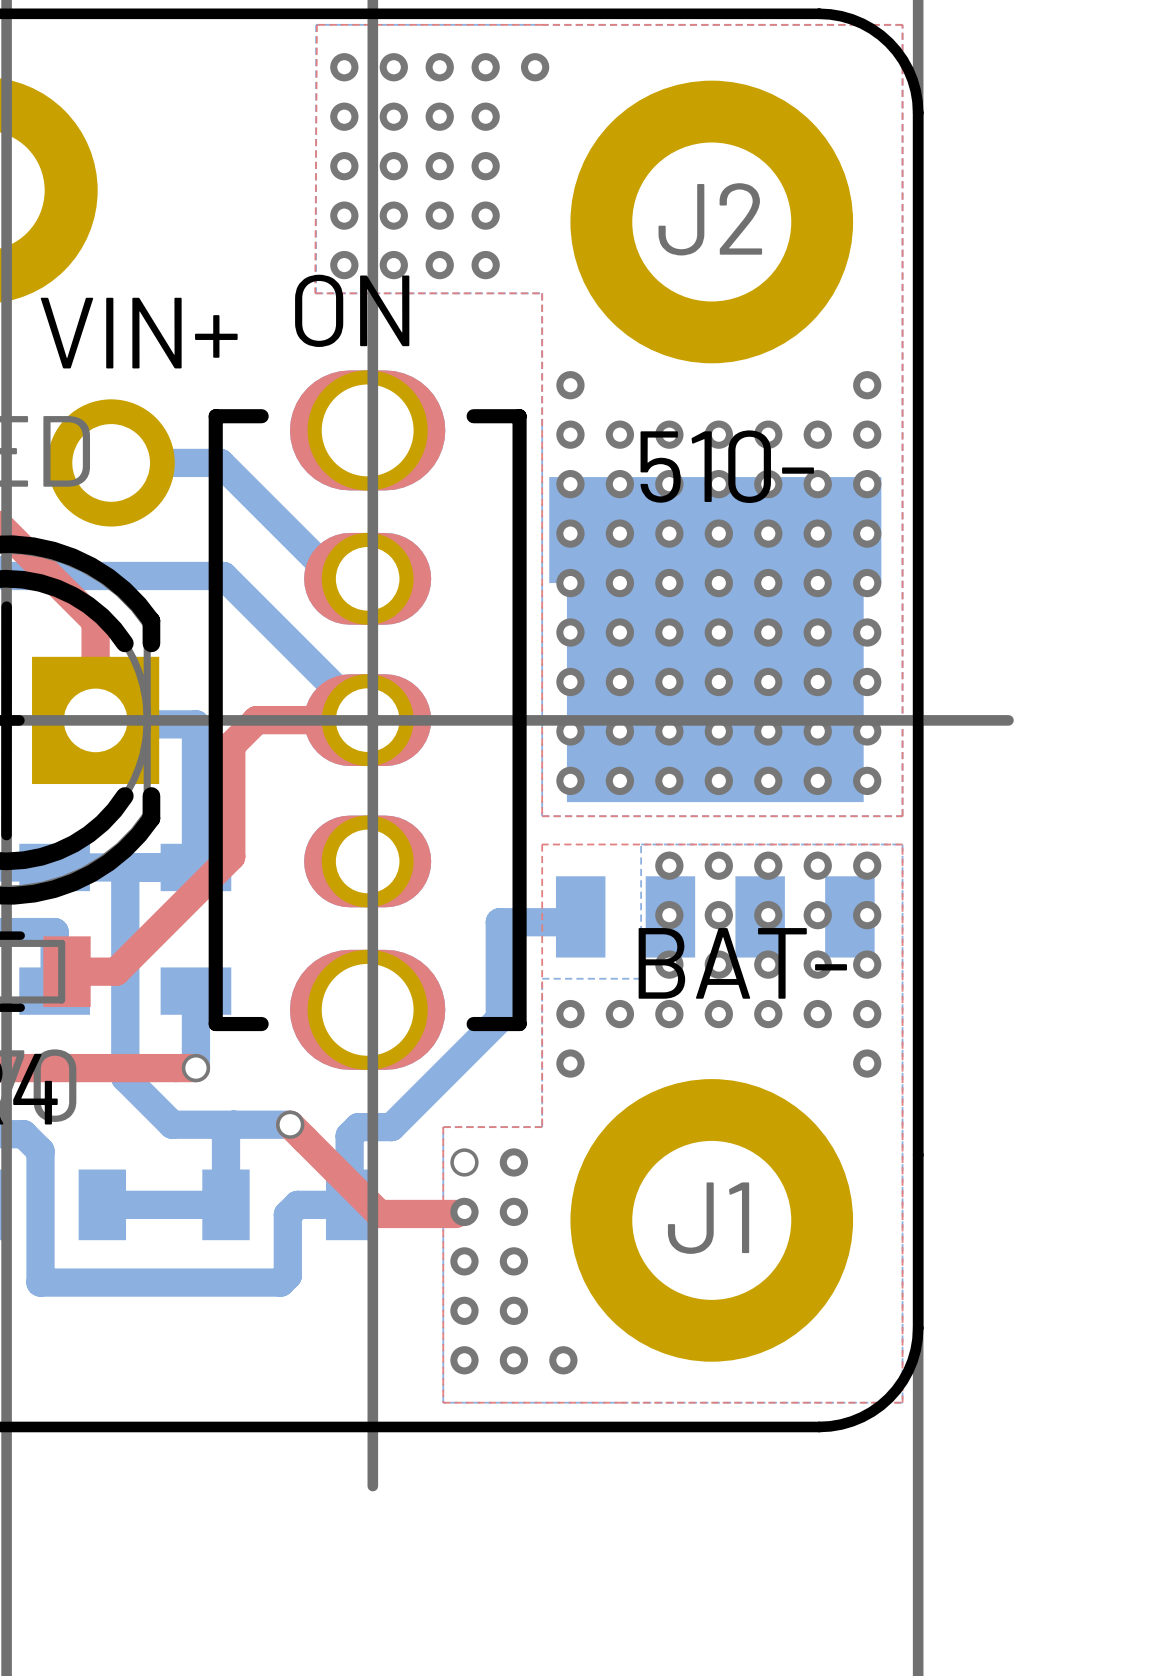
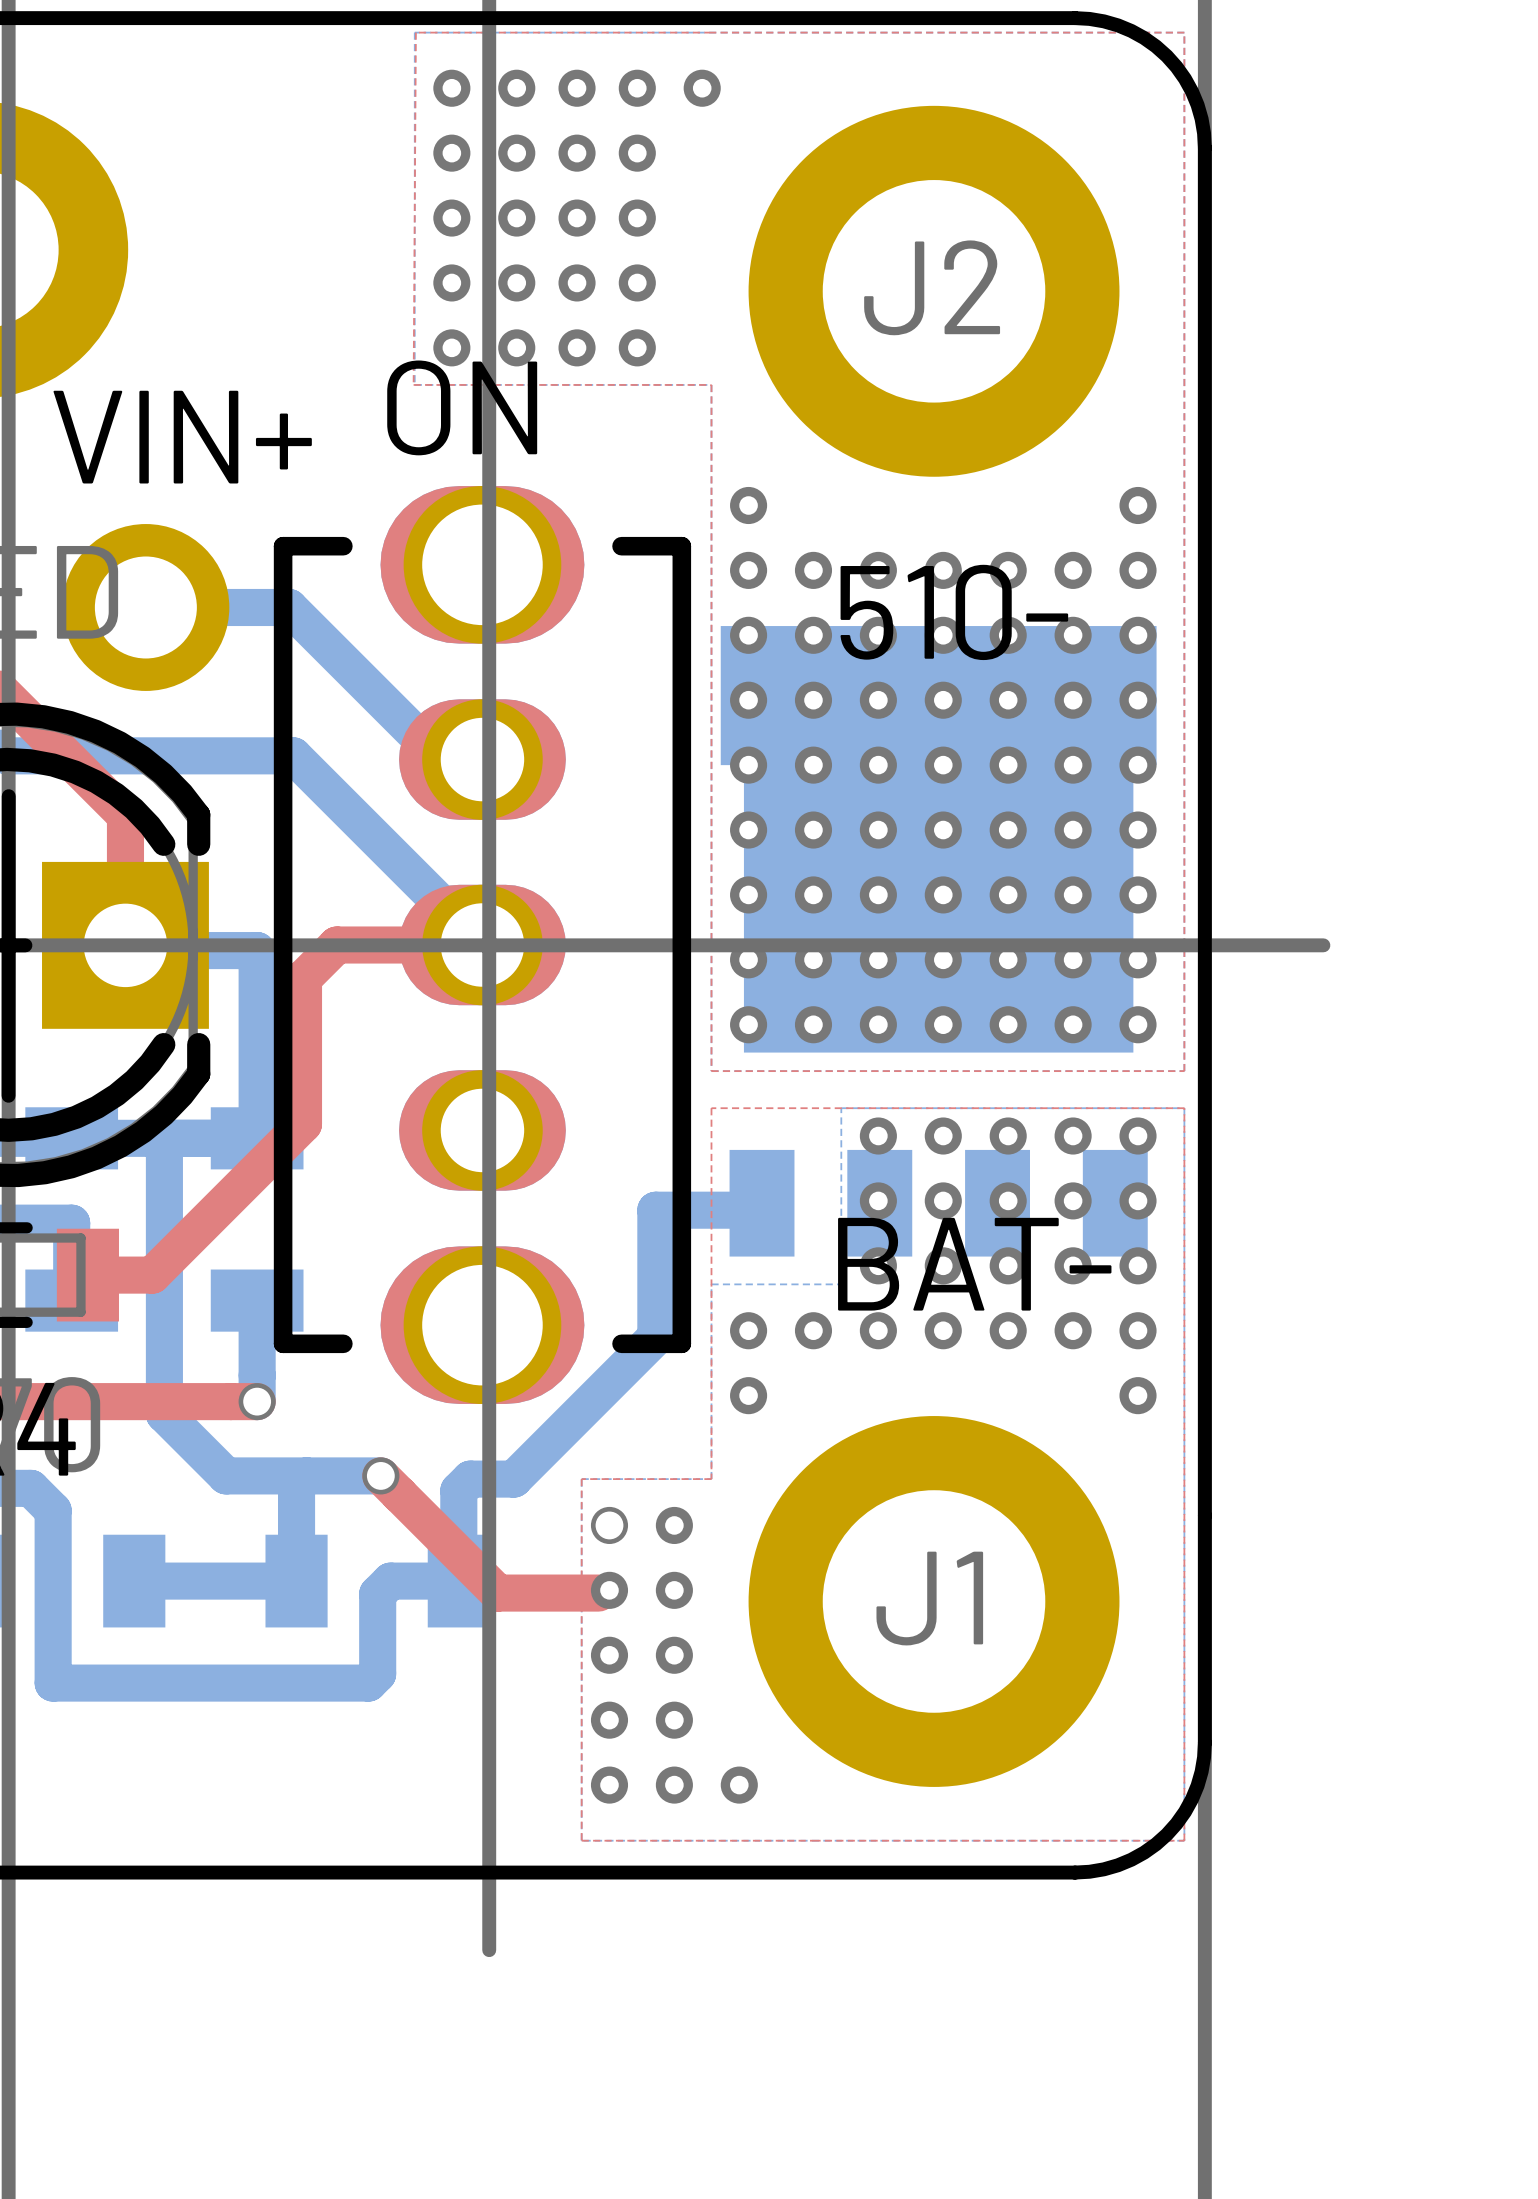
J2 footprint: [570, 80, 854, 364] -> [748, 105, 1120, 477]
J1 footprint: [570, 1079, 854, 1362] -> [748, 1416, 1120, 1787]

